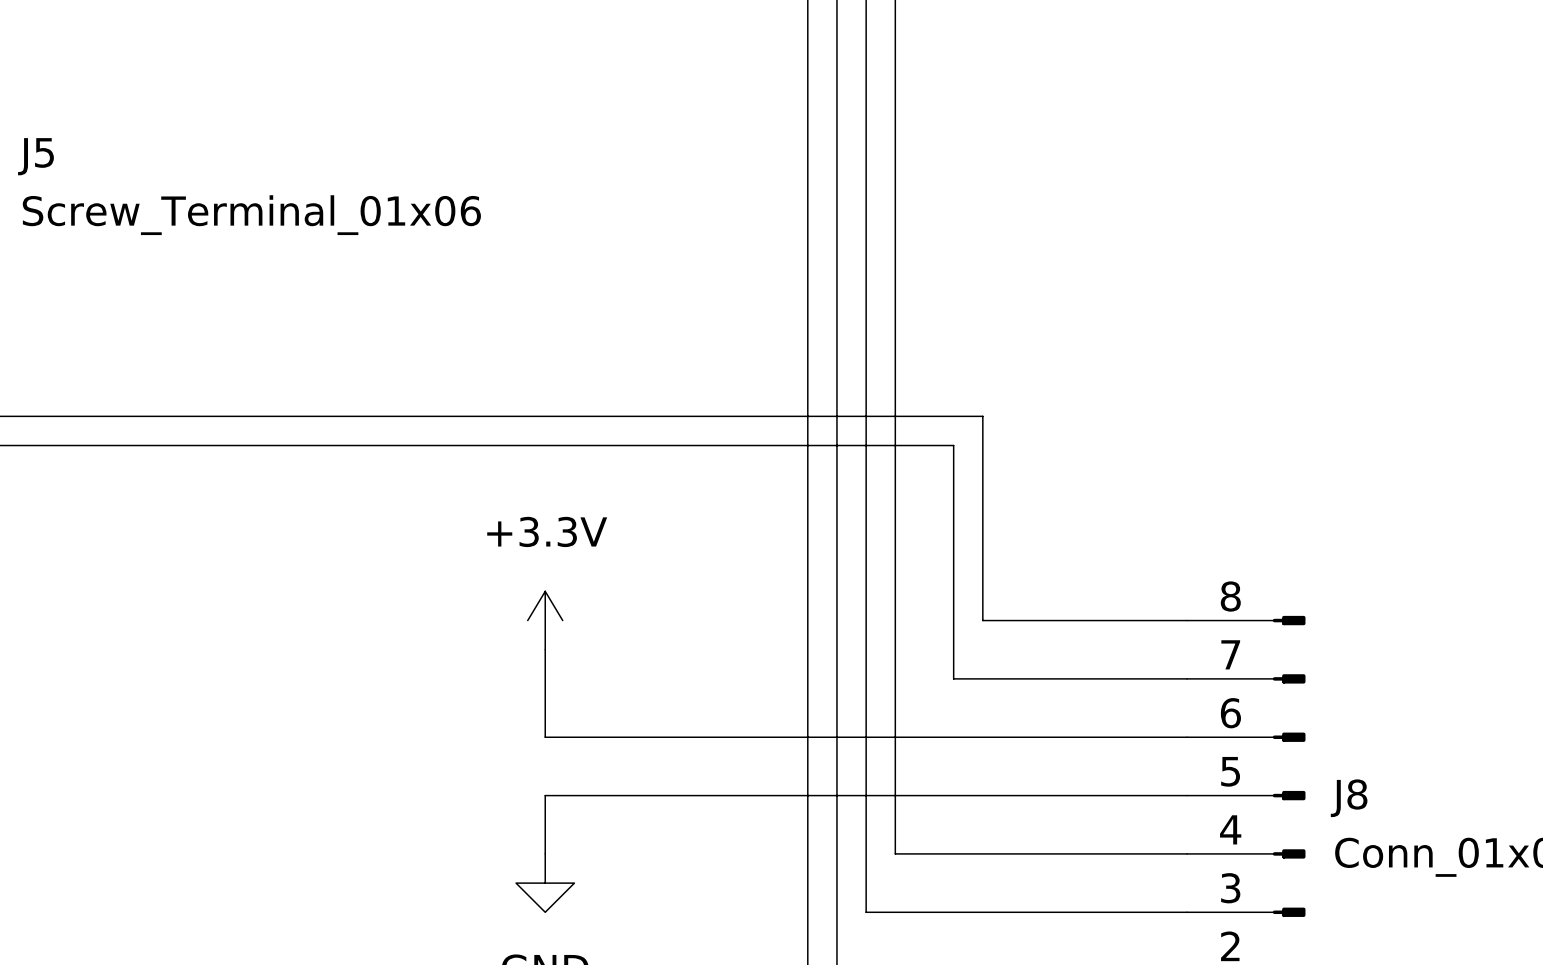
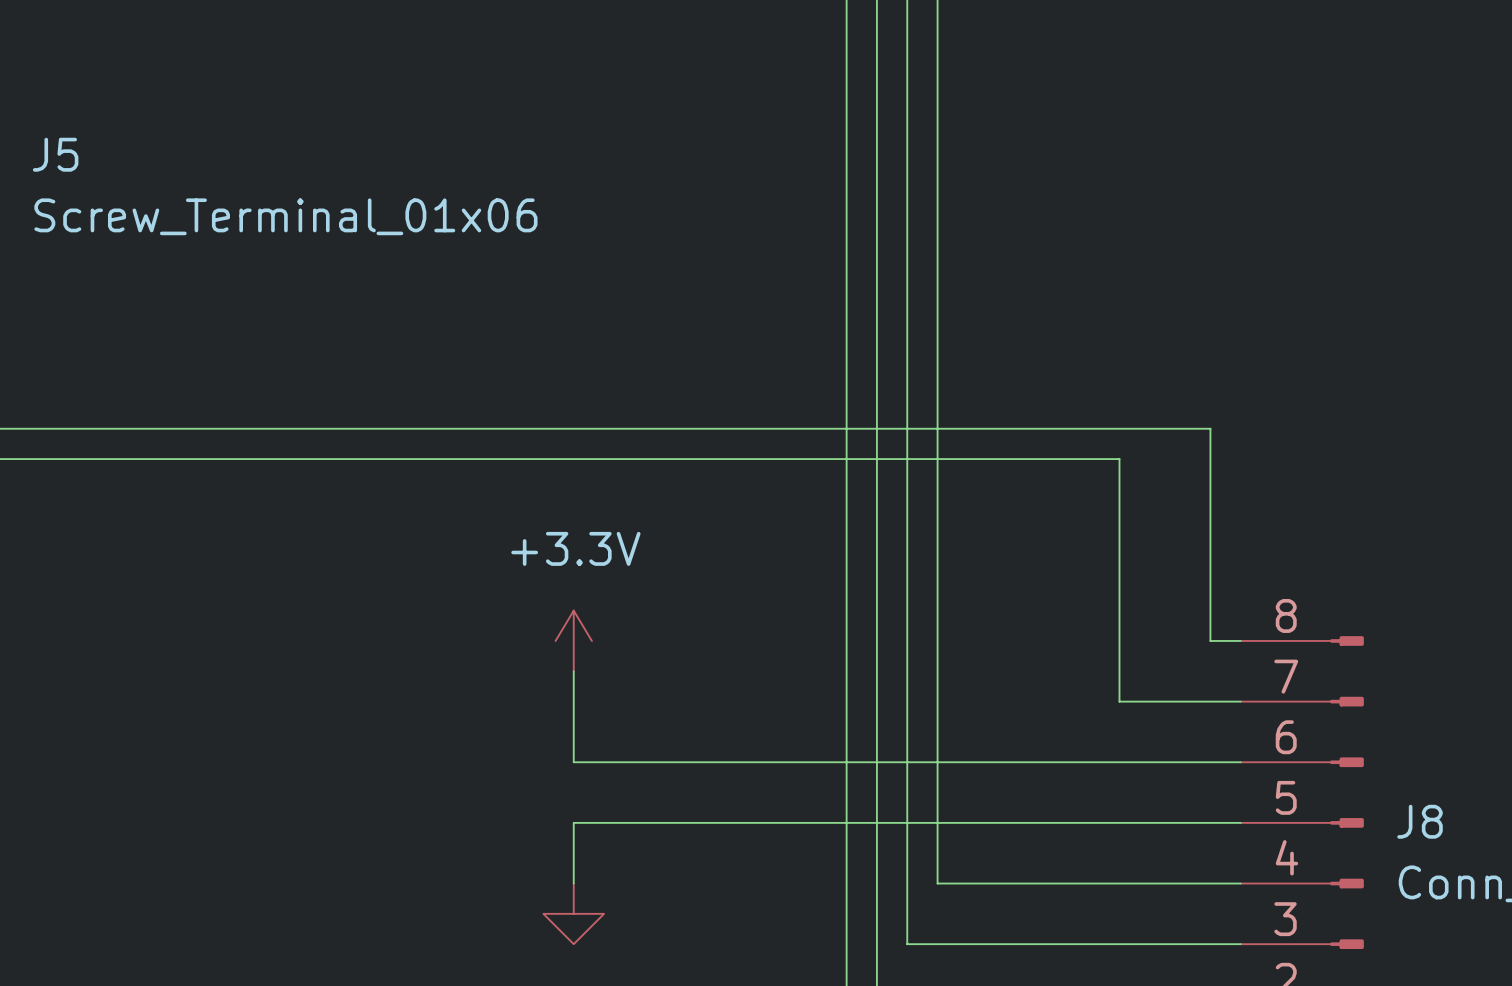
wire: (982, 416) (982, 620) (1157, 620) -> (1028, 428) (1210, 428) (1210, 640)
wire: (953, 445) (953, 678) (1070, 678) -> (998, 459) (1119, 459) (1119, 701)

